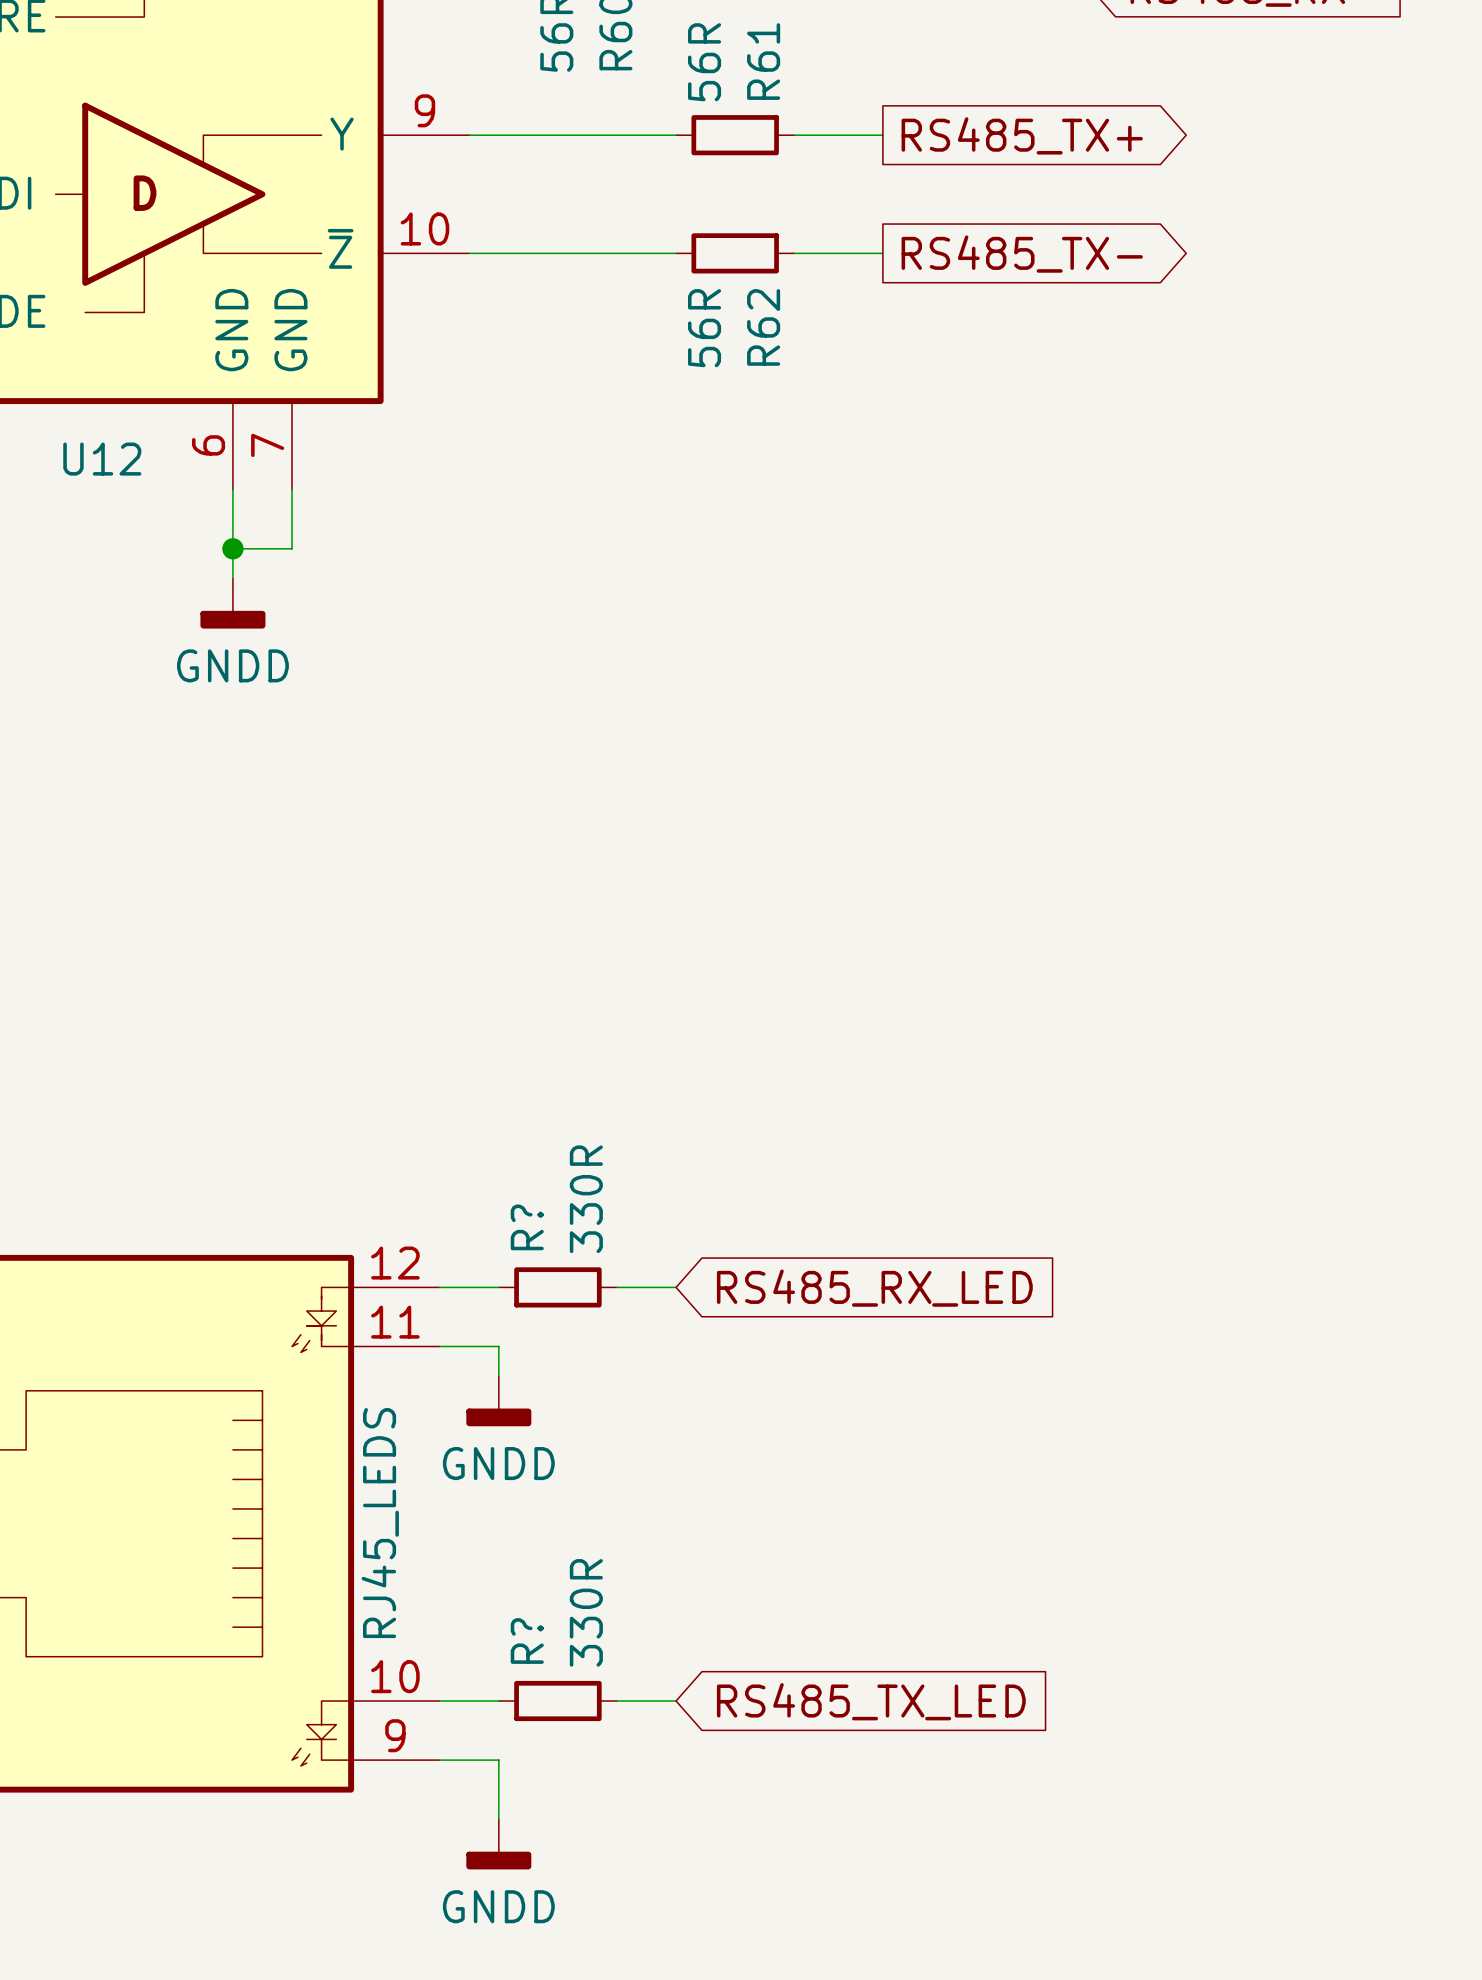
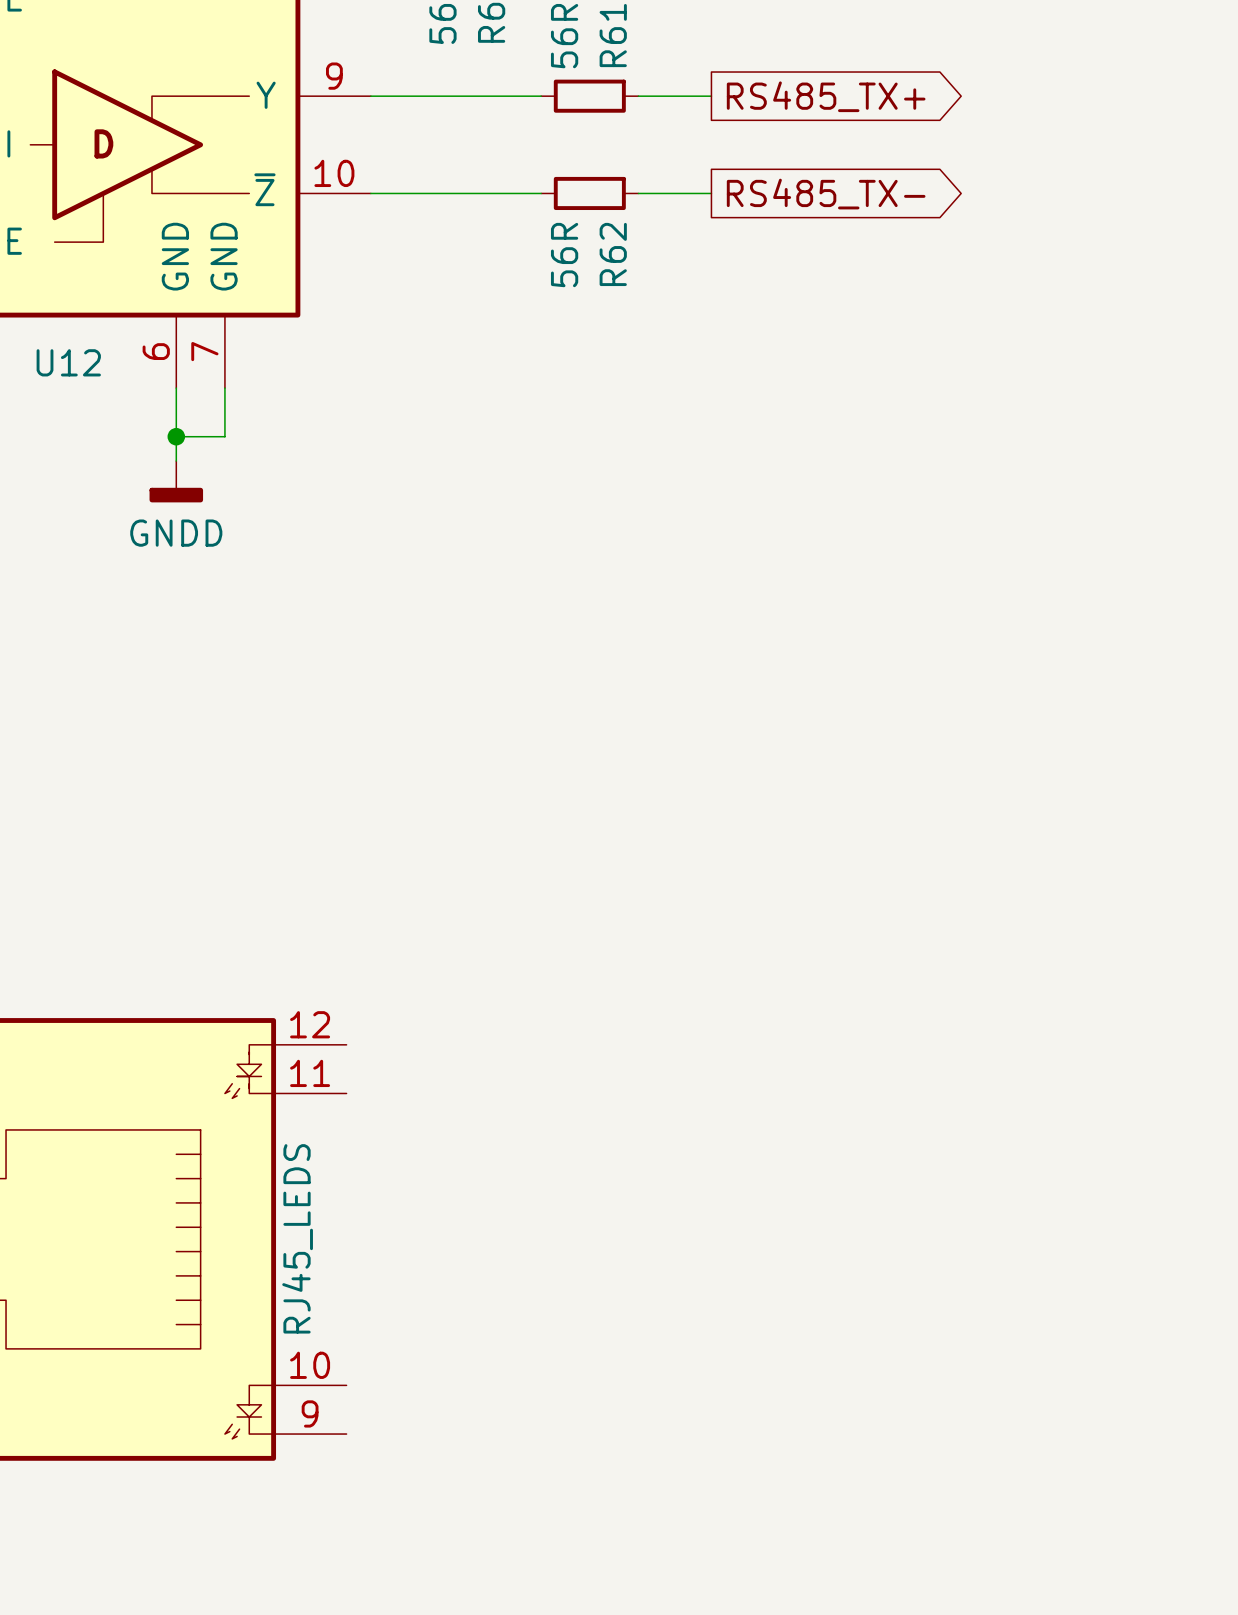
wire: (439, 1287) (498, 1287) -> none
R?: 330R (557, 1287) -> none
wire: (617, 1287) (676, 1287) -> none
global label: RS485_RX_LED (874, 1288) -> none
wire: (439, 1346) (498, 1346) (498, 1376) -> none
power symbol: GNDD (498, 1401) -> none
wire: (439, 1701) (498, 1701) -> none
R?: 330R (557, 1701) -> none
wire: (617, 1701) (676, 1701) -> none
global label: RS485_TX_LED (871, 1701) -> none
wire: (439, 1760) (498, 1760) (498, 1819) -> none
power symbol: GNDD (498, 1844) -> none

